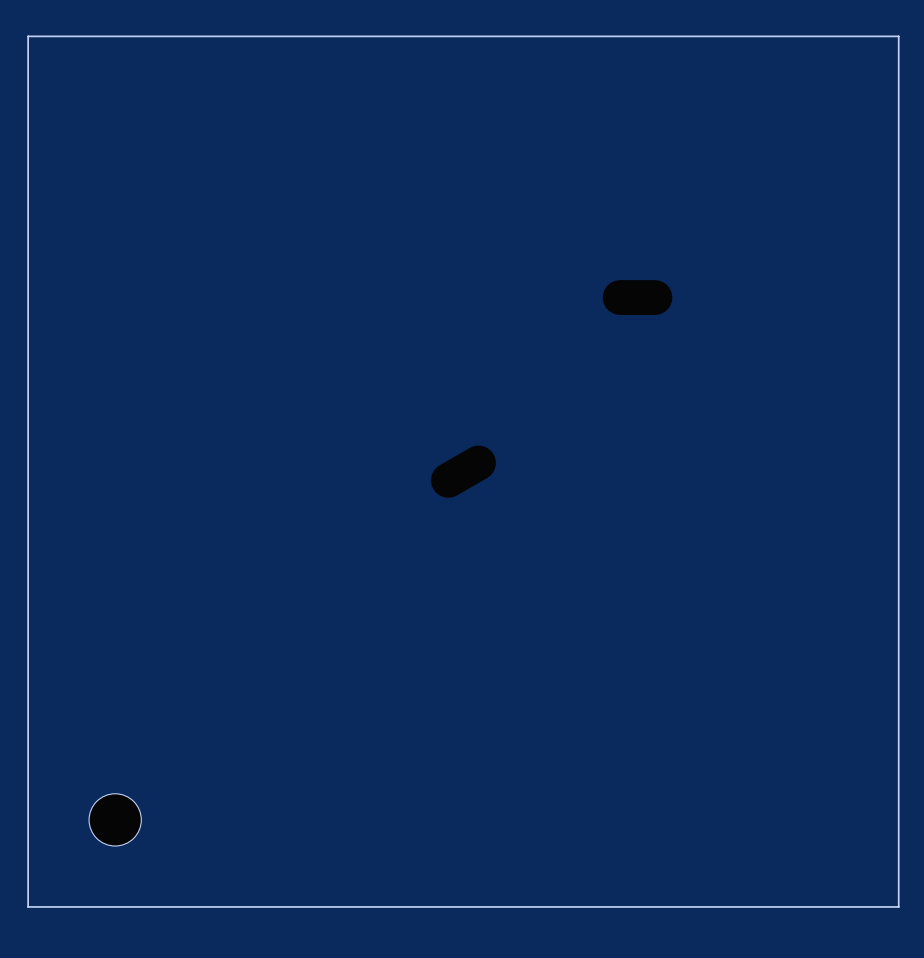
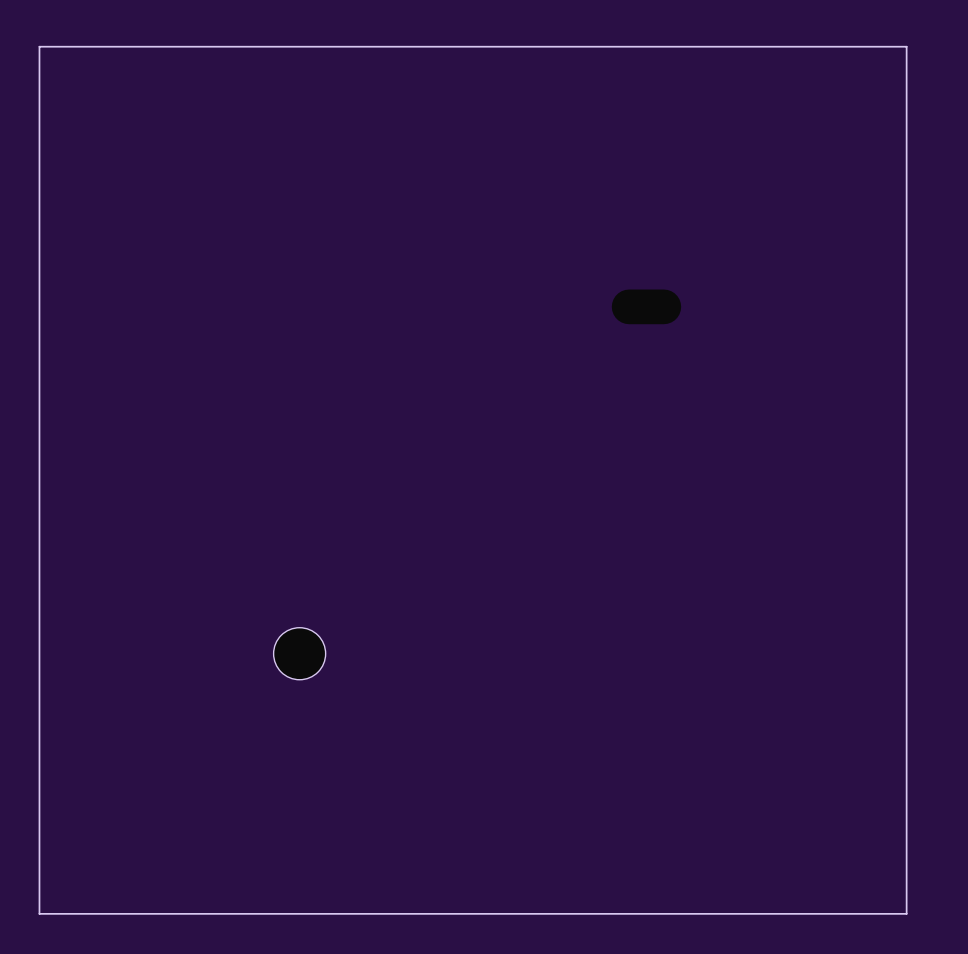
part: (463, 471) -> none
part position: (115, 819) -> (299, 653)

